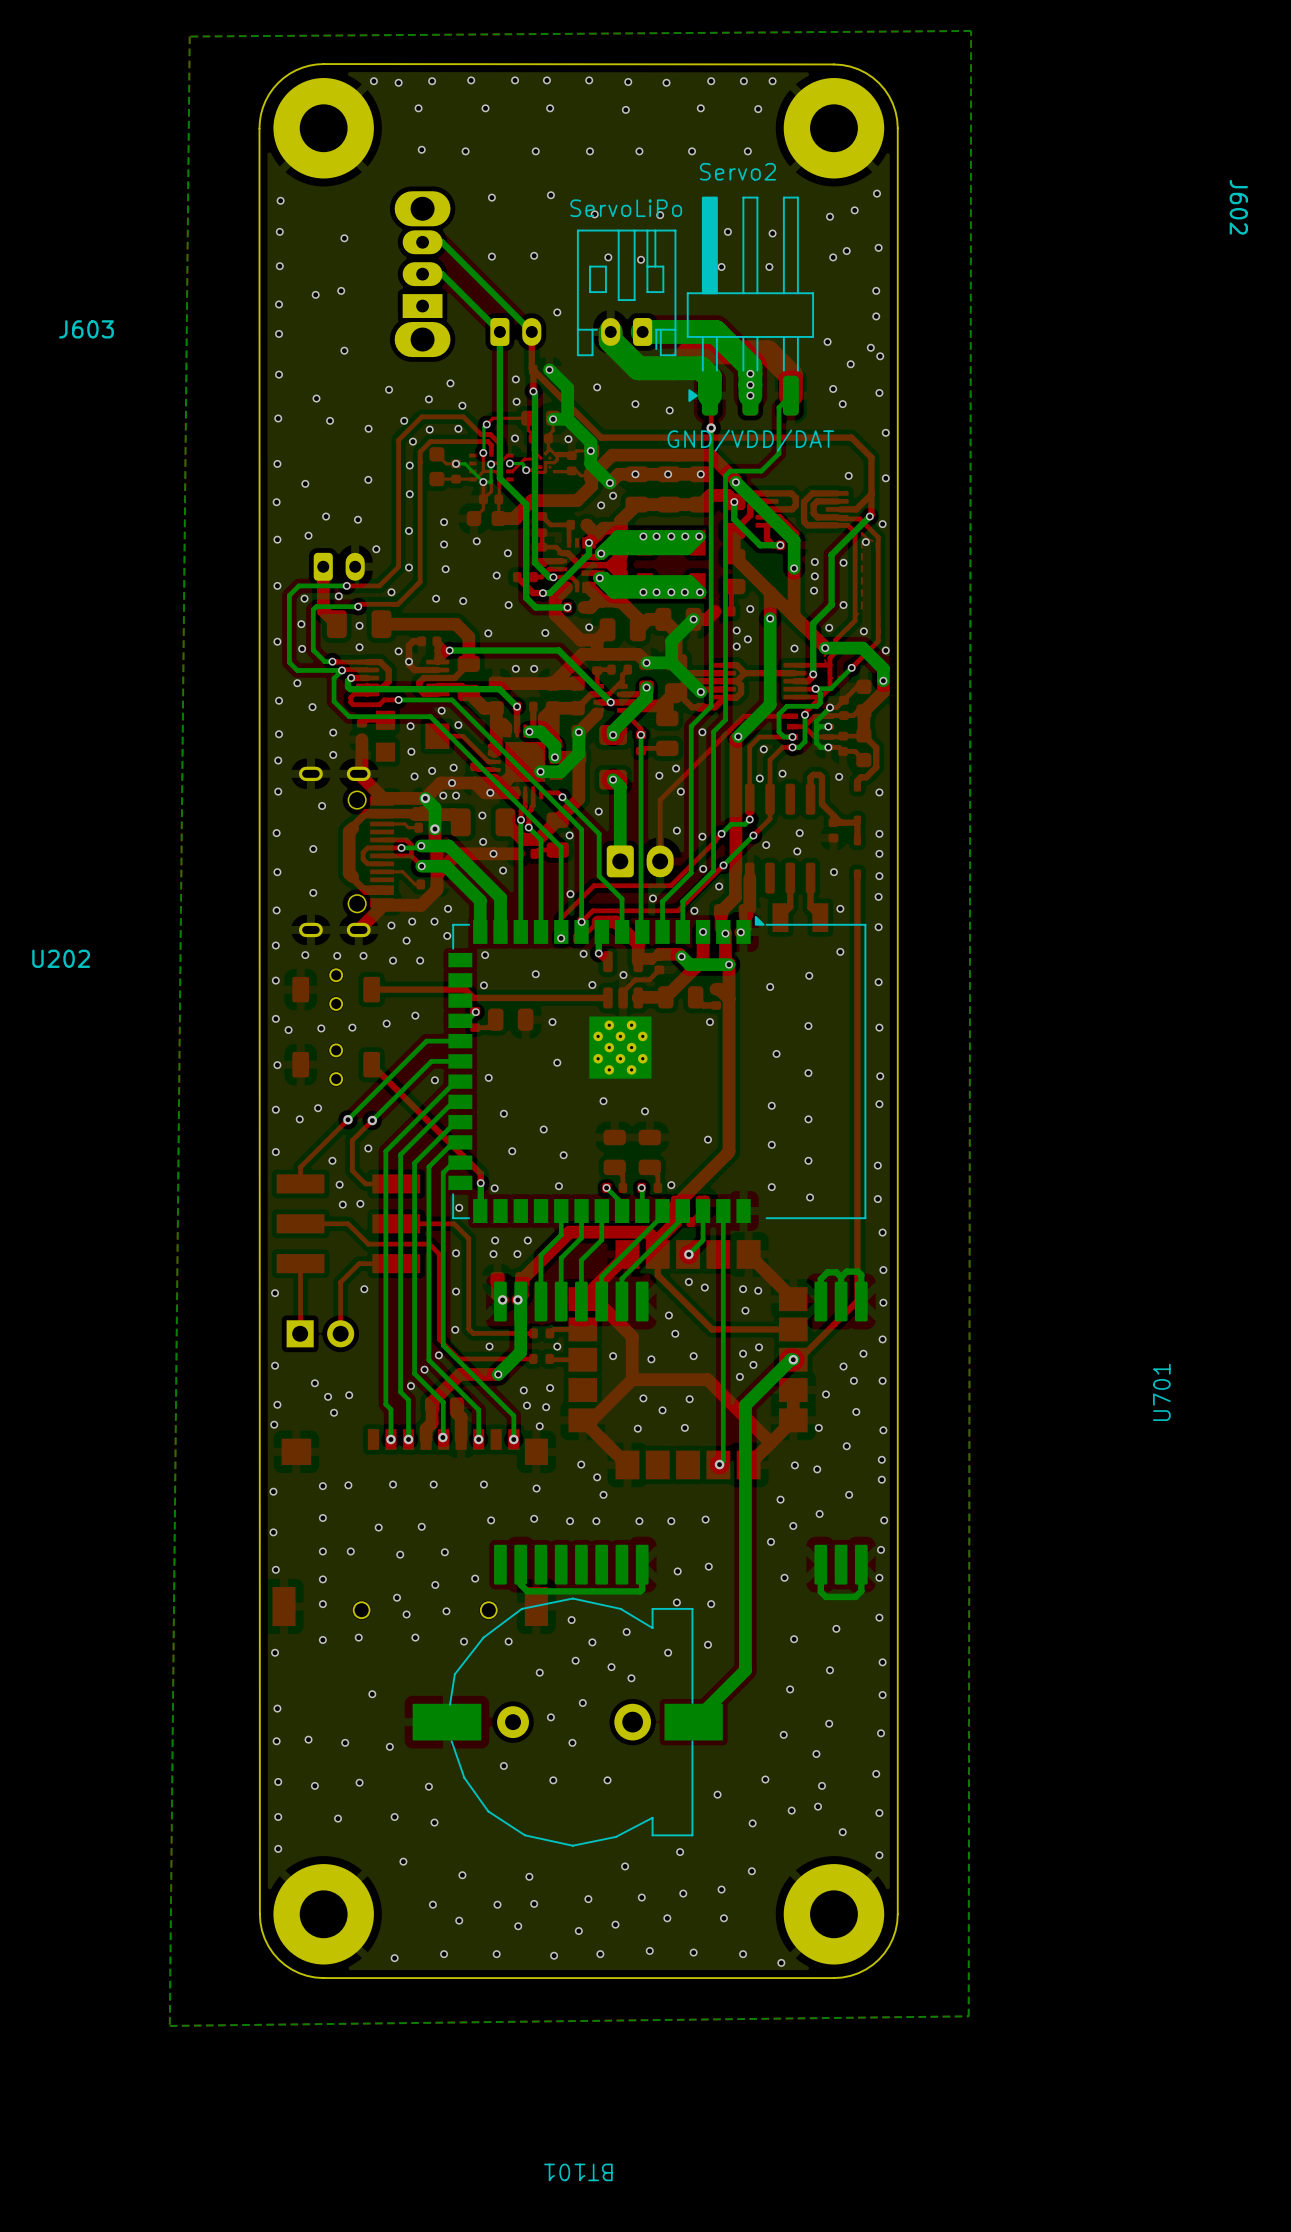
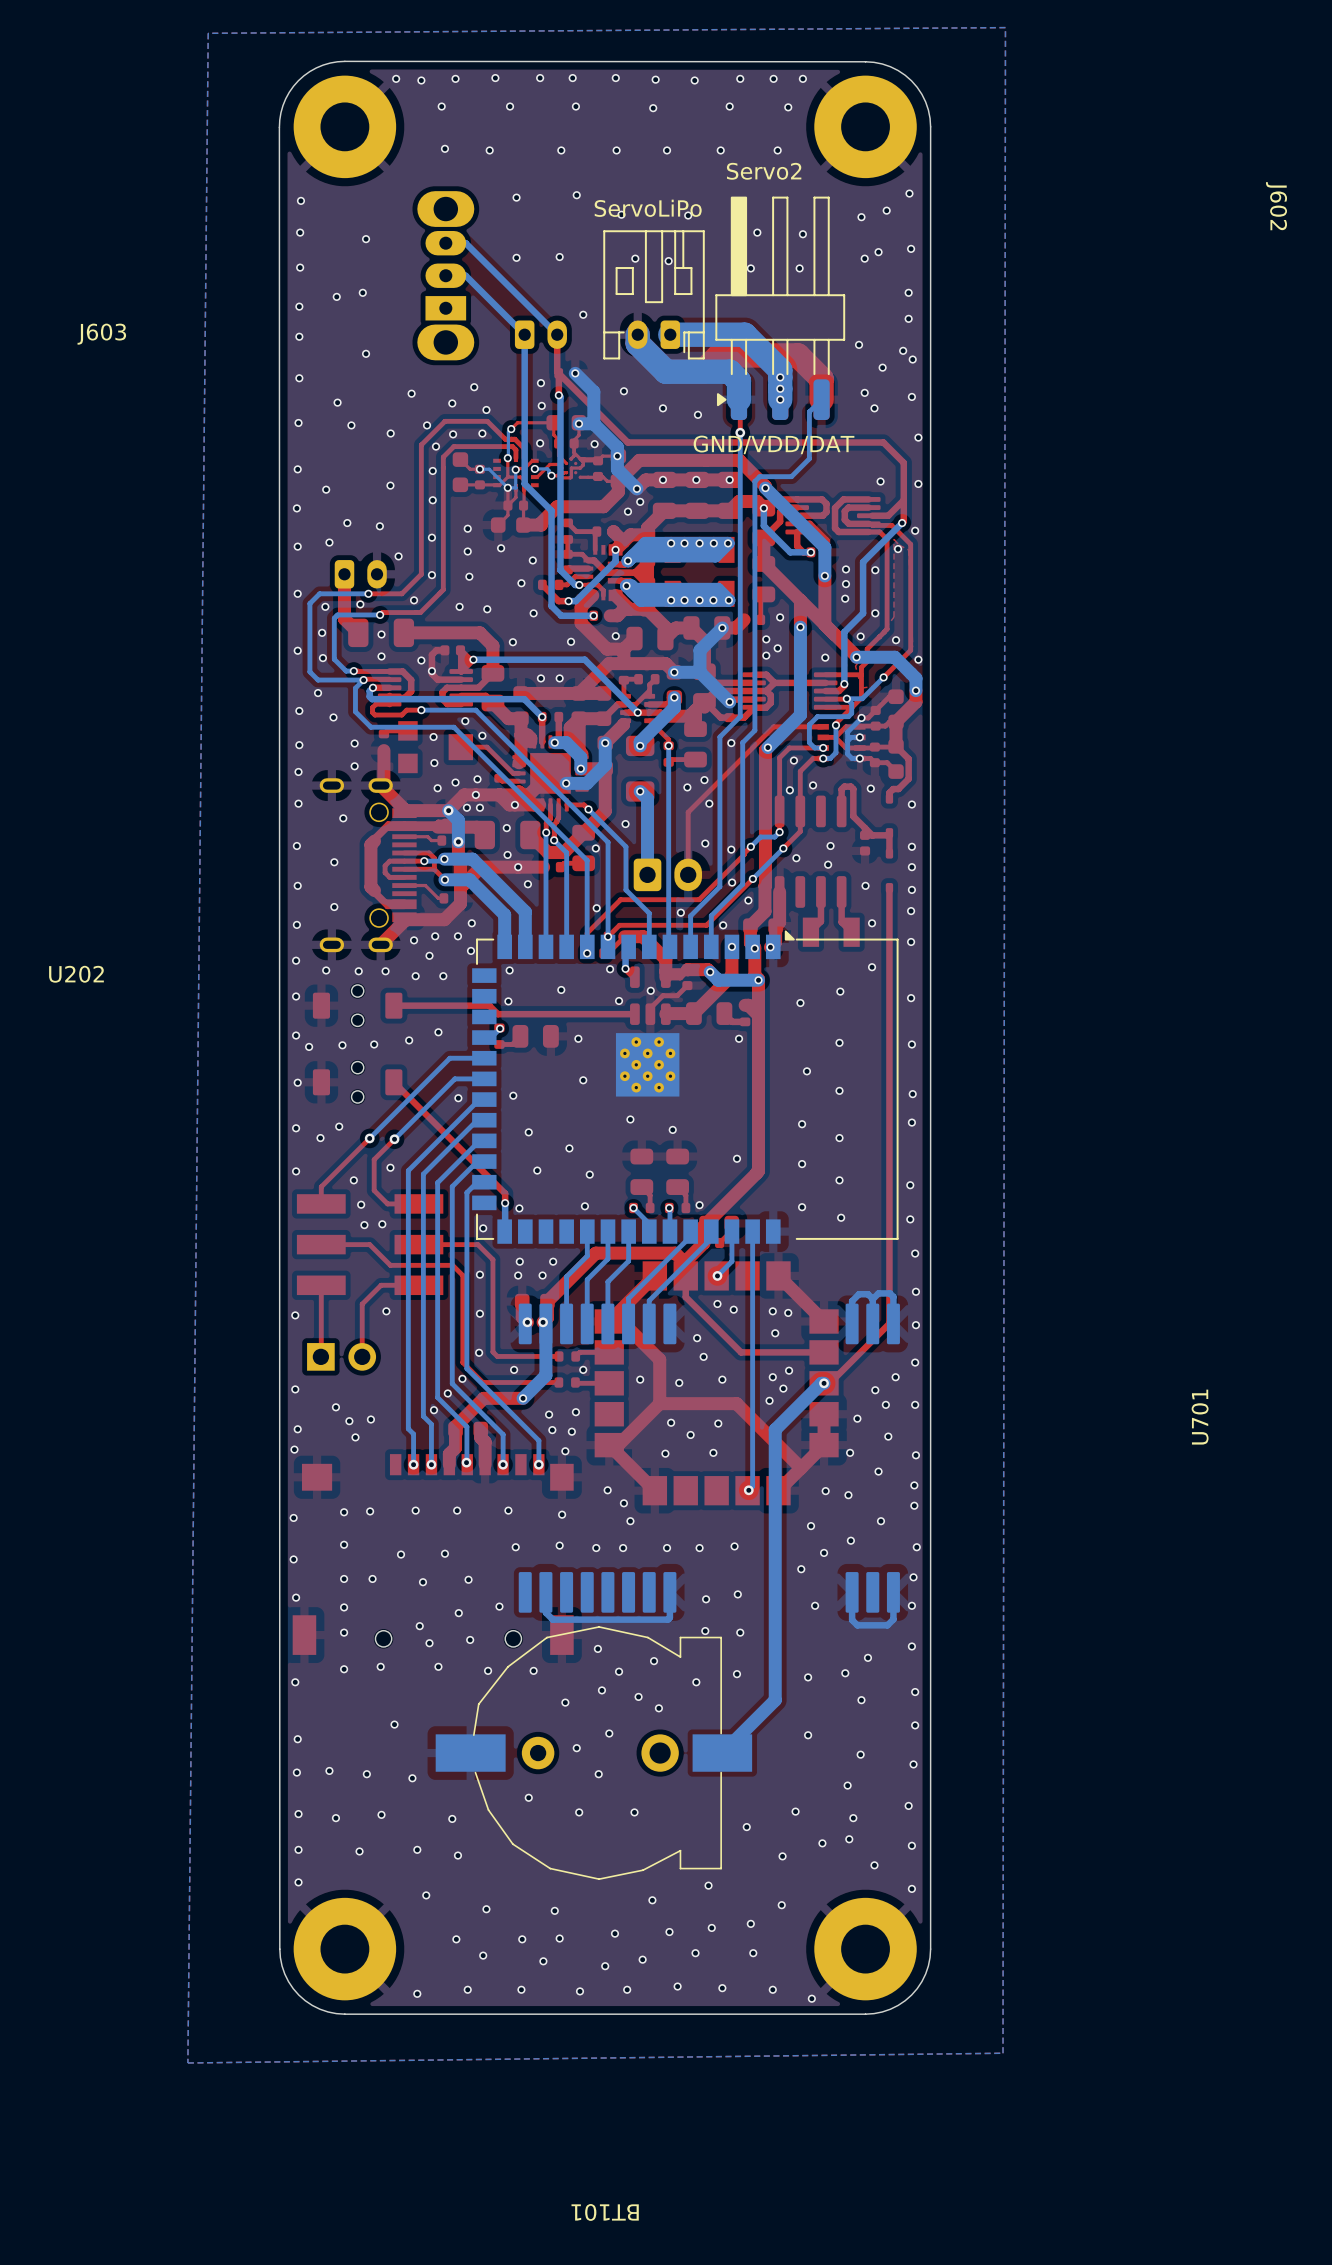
via: (794, 1639) -> none
via: none -> (845, 1673)
via: none -> (808, 1677)
via: (790, 1689) -> none
via: none -> (808, 1735)
via: (783, 1734) -> none

